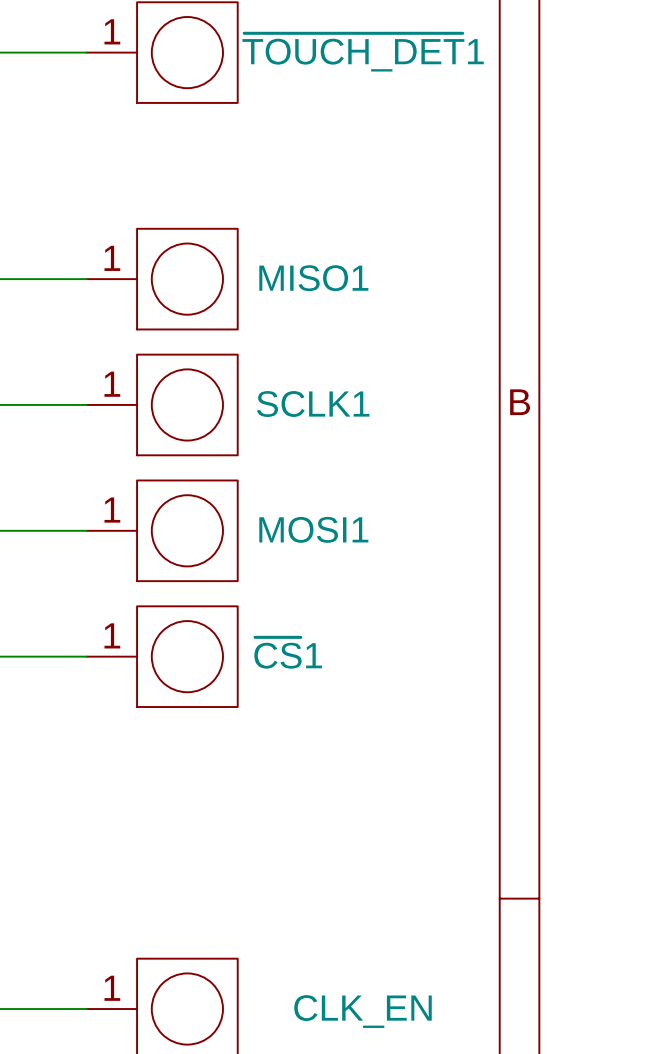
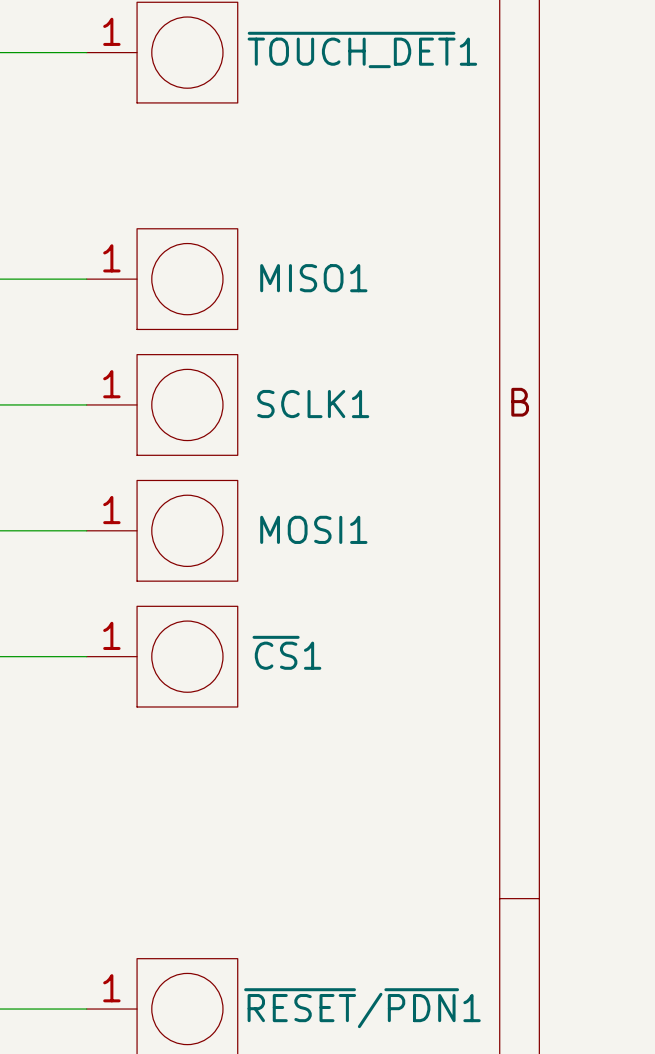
CLK_EN name: CLK_EN (363, 1011) -> ~{RESET}/~{PDN}1 (362, 1008)

